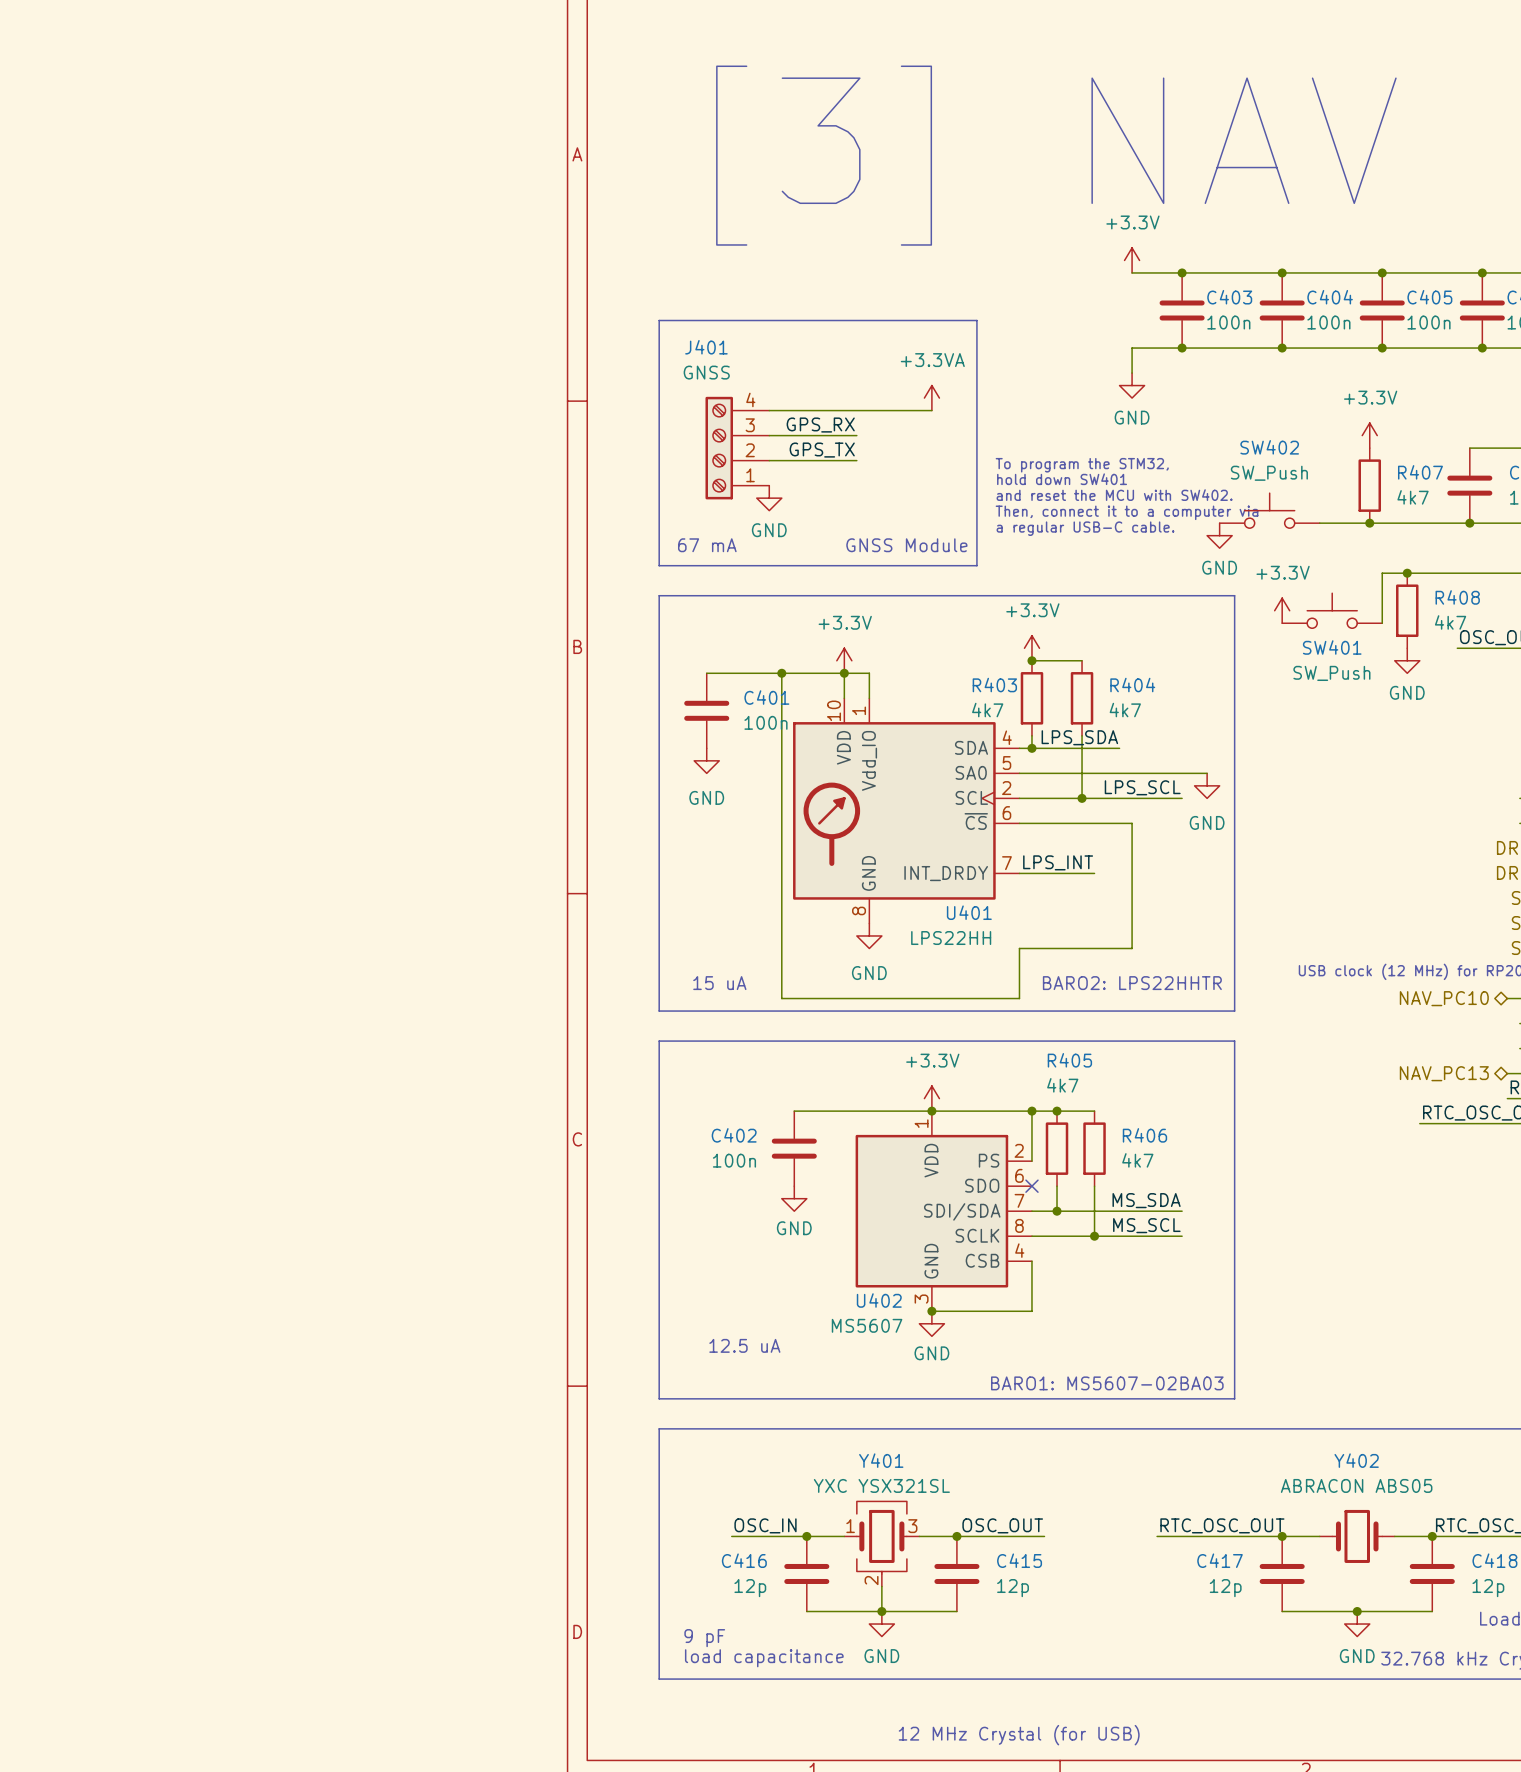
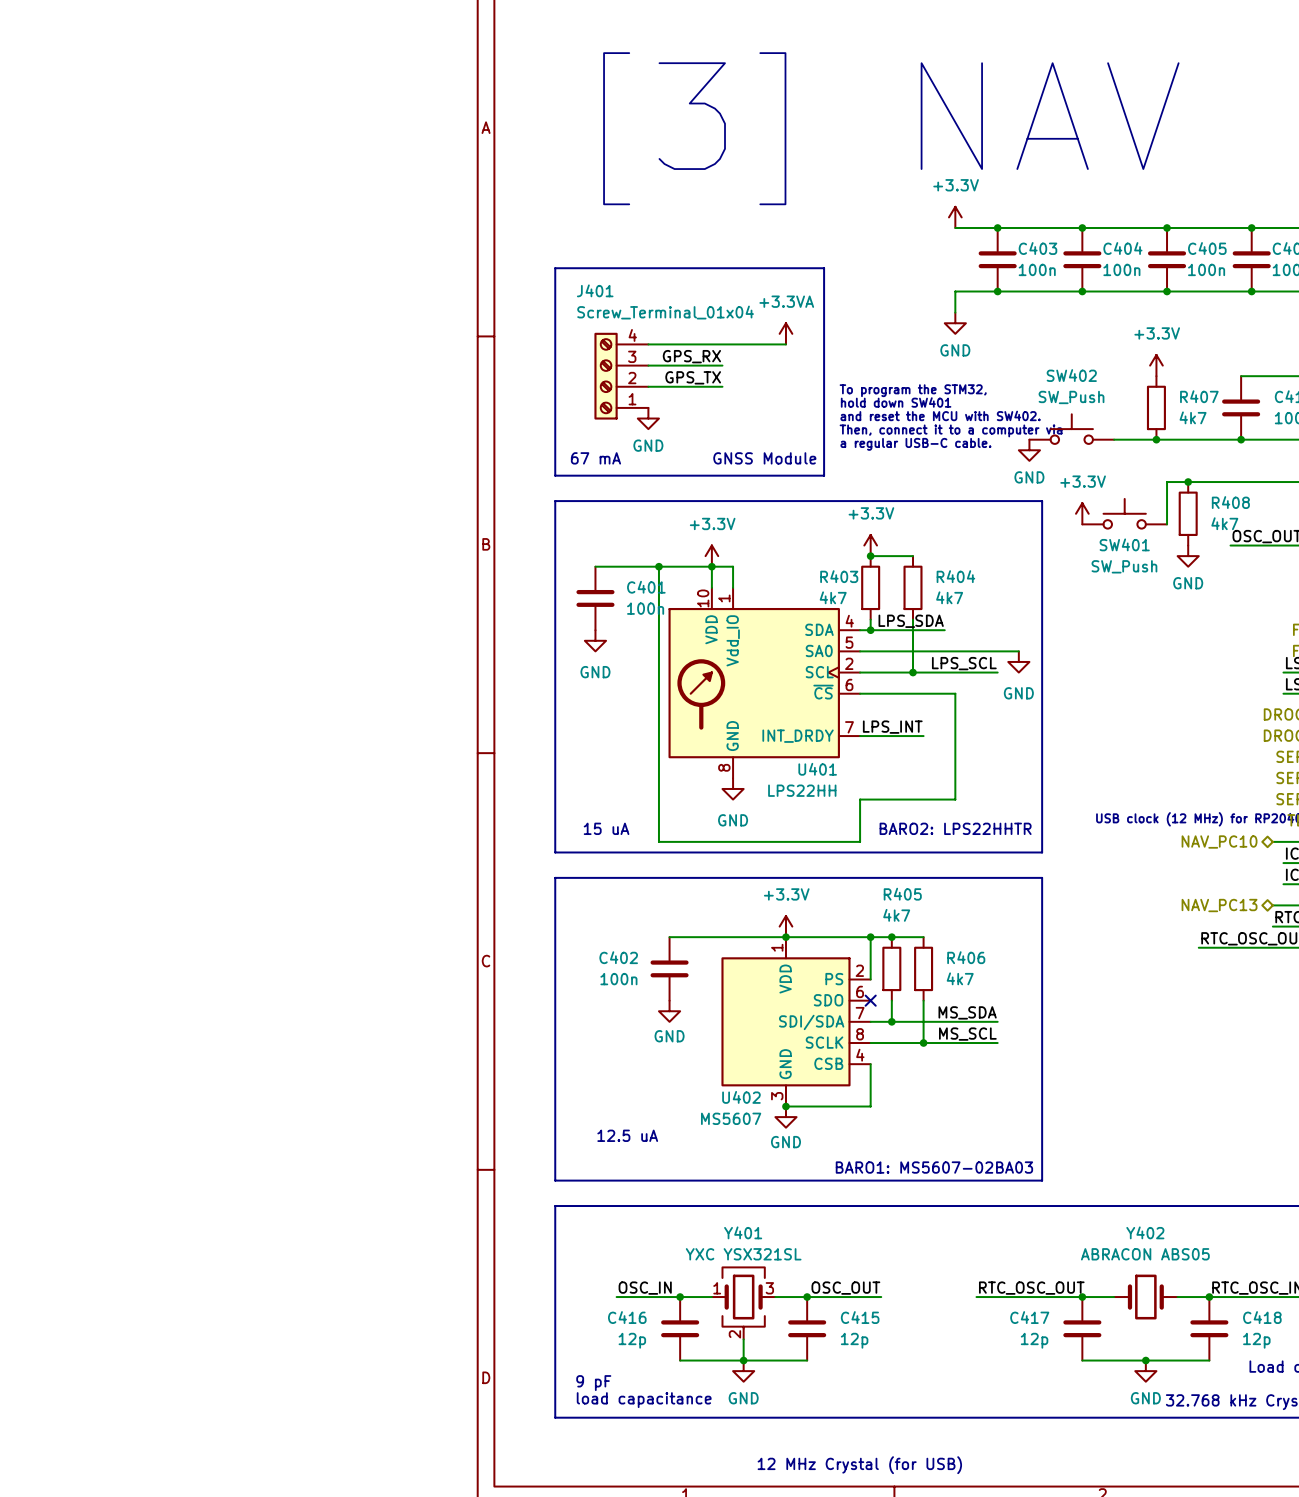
J401 value: GNSS (706, 372) -> Screw_Terminal_01x04 (665, 312)

